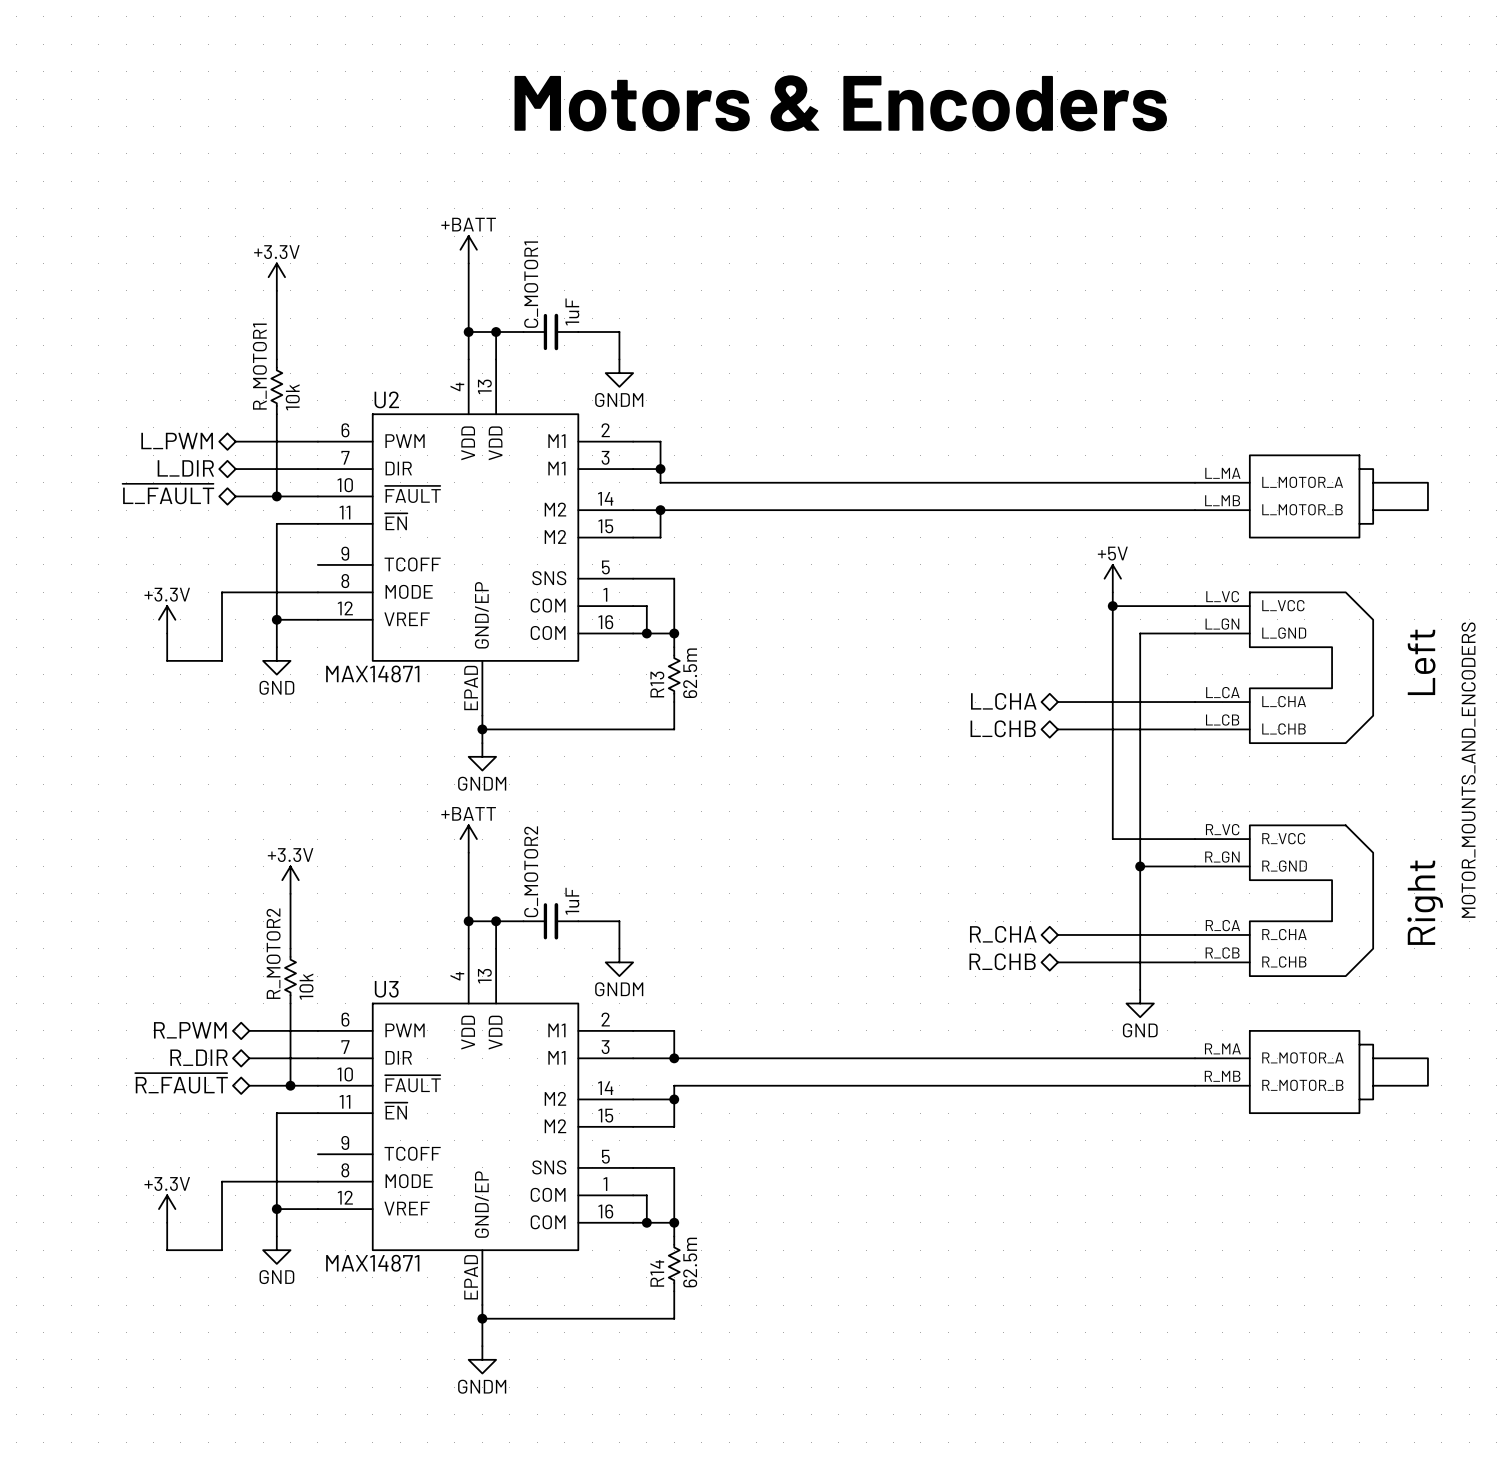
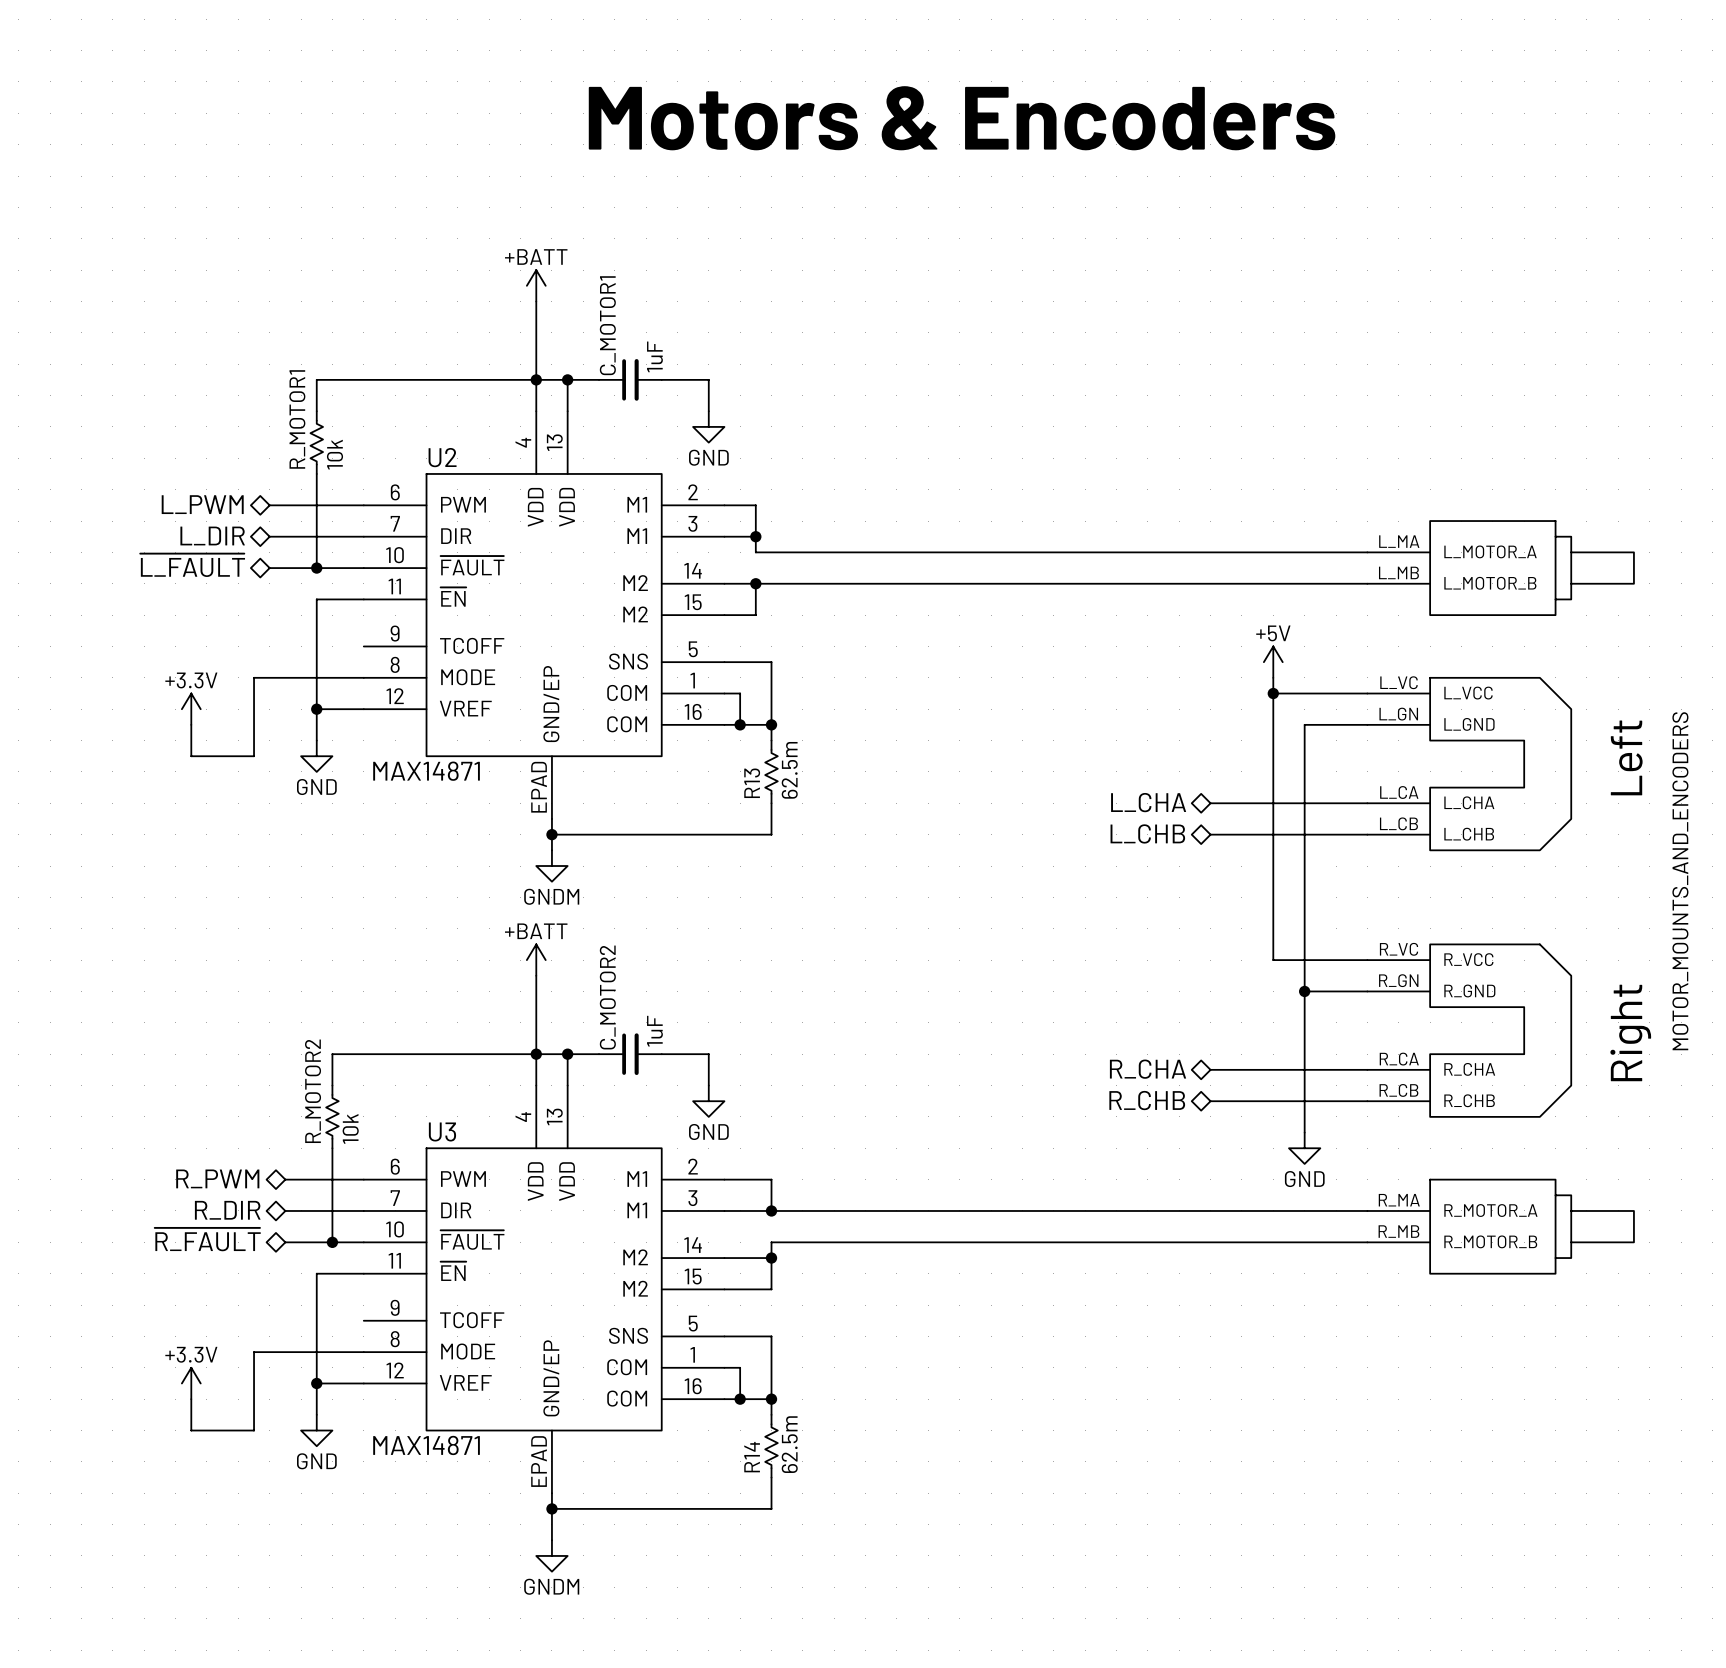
power symbol: +3.3V (276, 277) -> none
wire: (276, 290) (276, 332) -> (536, 379) (316, 379)
power symbol: GNDM (619, 373) -> GND (708, 426)
power symbol: +3.3V (290, 880) -> none
wire: (290, 893) (290, 921) -> (536, 1054) (332, 1054)
power symbol: GNDM (619, 962) -> GND (708, 1101)

